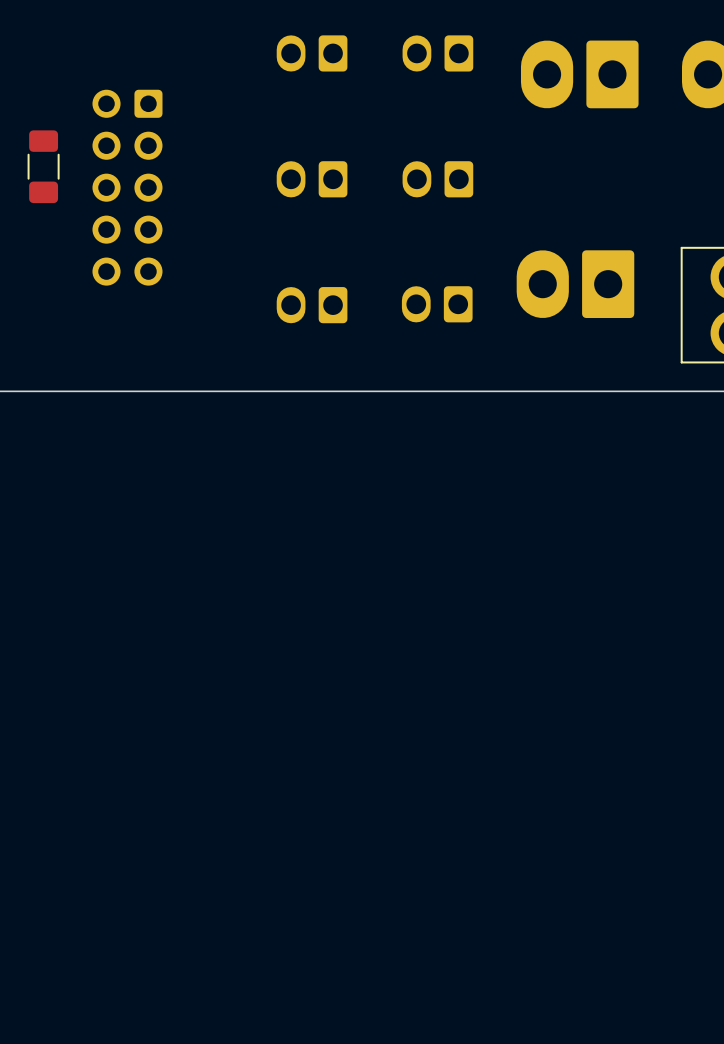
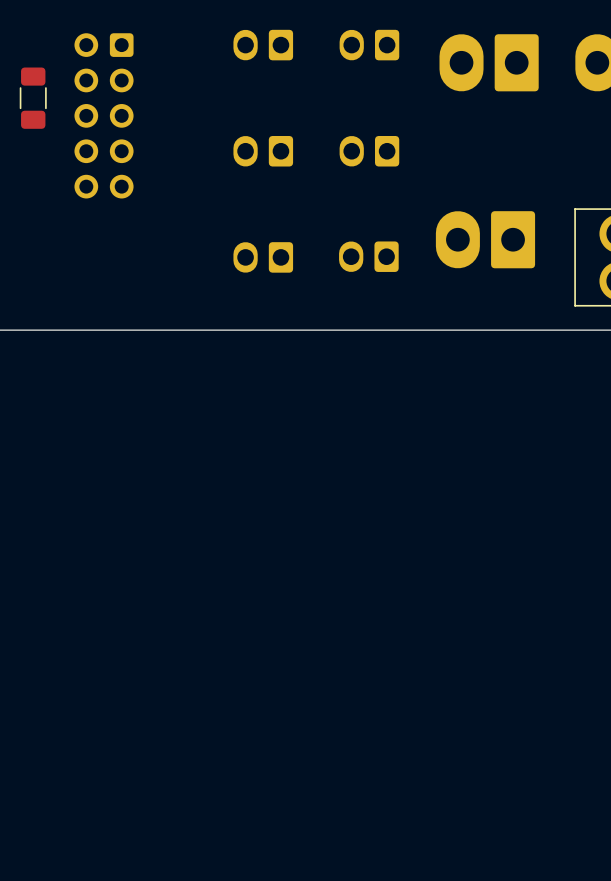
part position: (43, 166) -> (33, 98)
part position: (127, 187) -> (104, 115)

